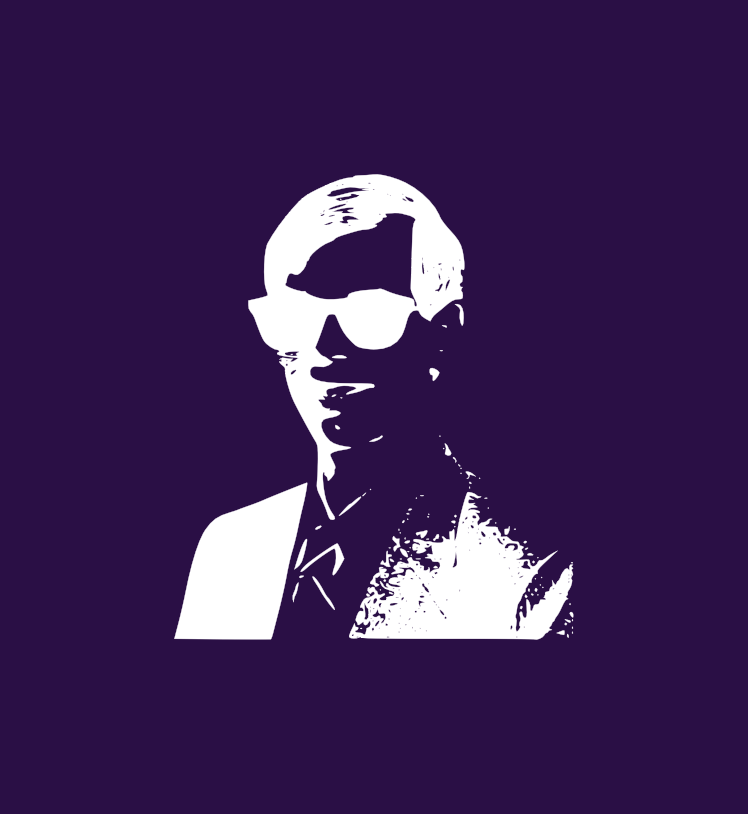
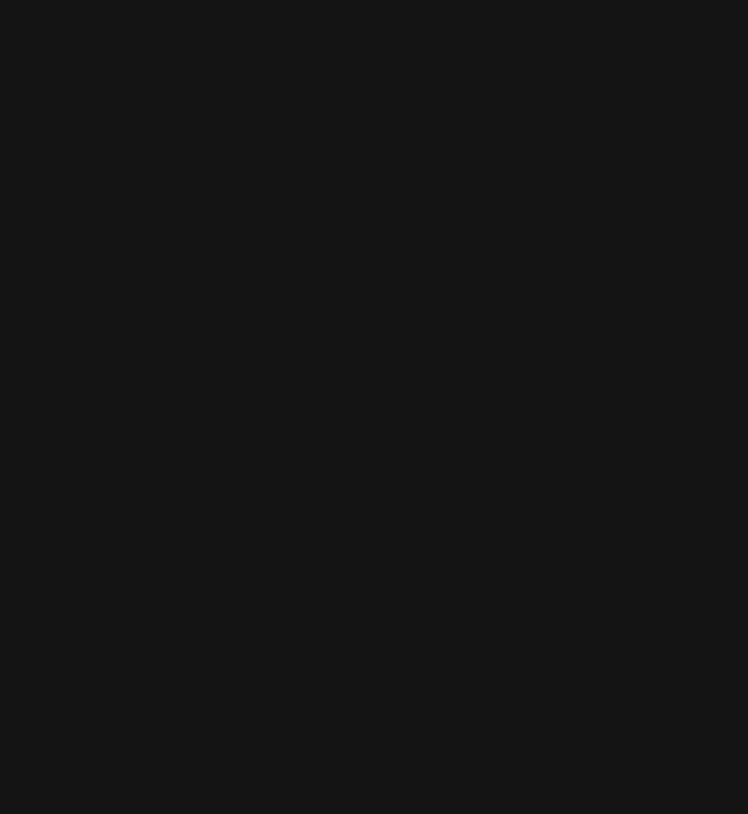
drawing: [174, 174, 574, 640] -> none

